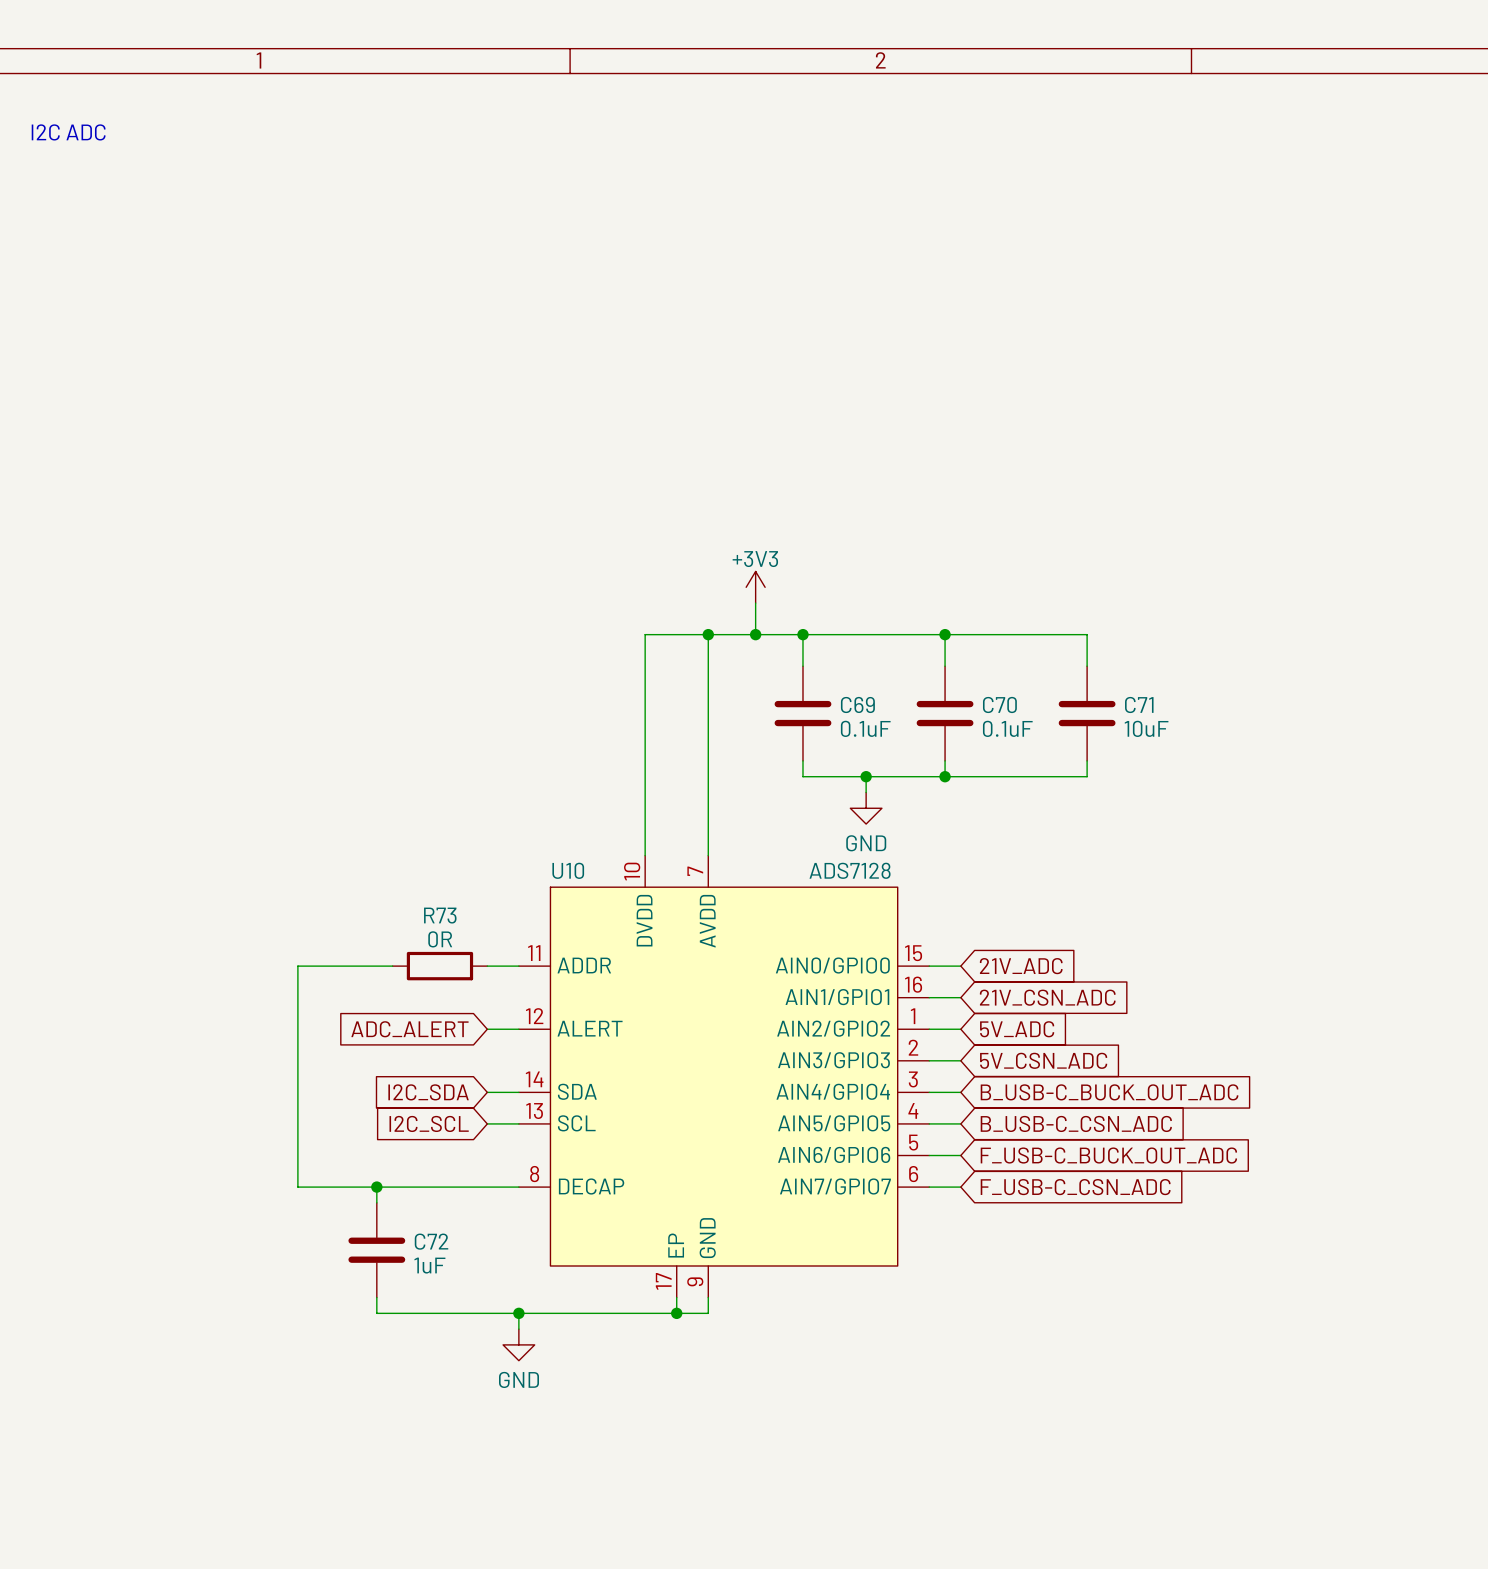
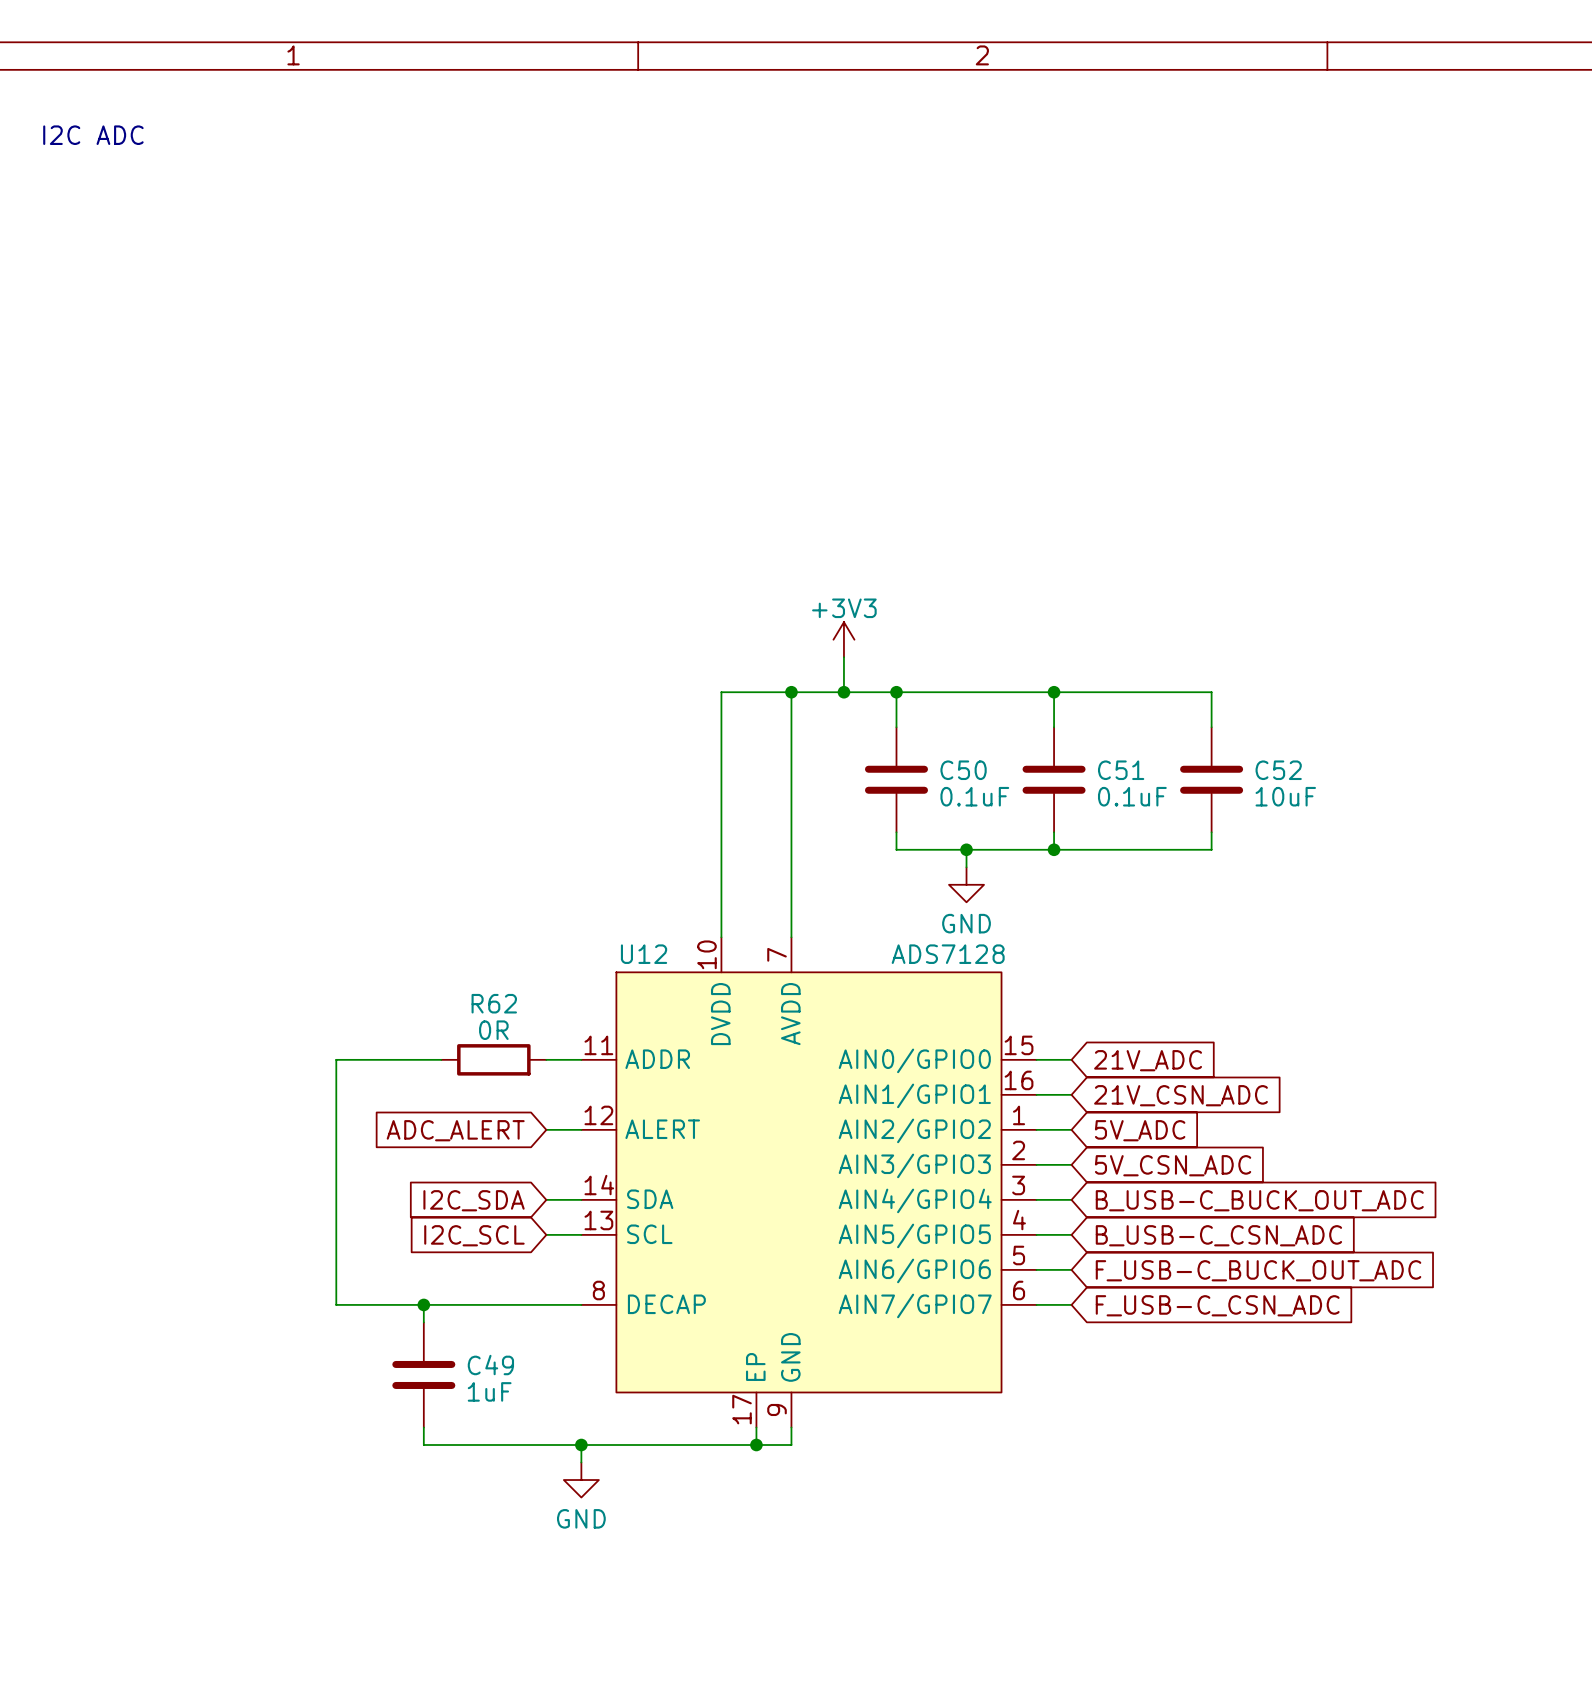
C69 name: C69 (857, 704) -> C50 (963, 770)
C70 name: C70 (999, 704) -> C51 (1121, 770)
C71 name: C71 (1139, 704) -> C52 (1278, 770)
U10 name: U10 (568, 870) -> U12 (644, 954)
R73 name: R73 (440, 915) -> R62 (494, 1003)
C72 name: C72 (431, 1241) -> C49 (490, 1365)

